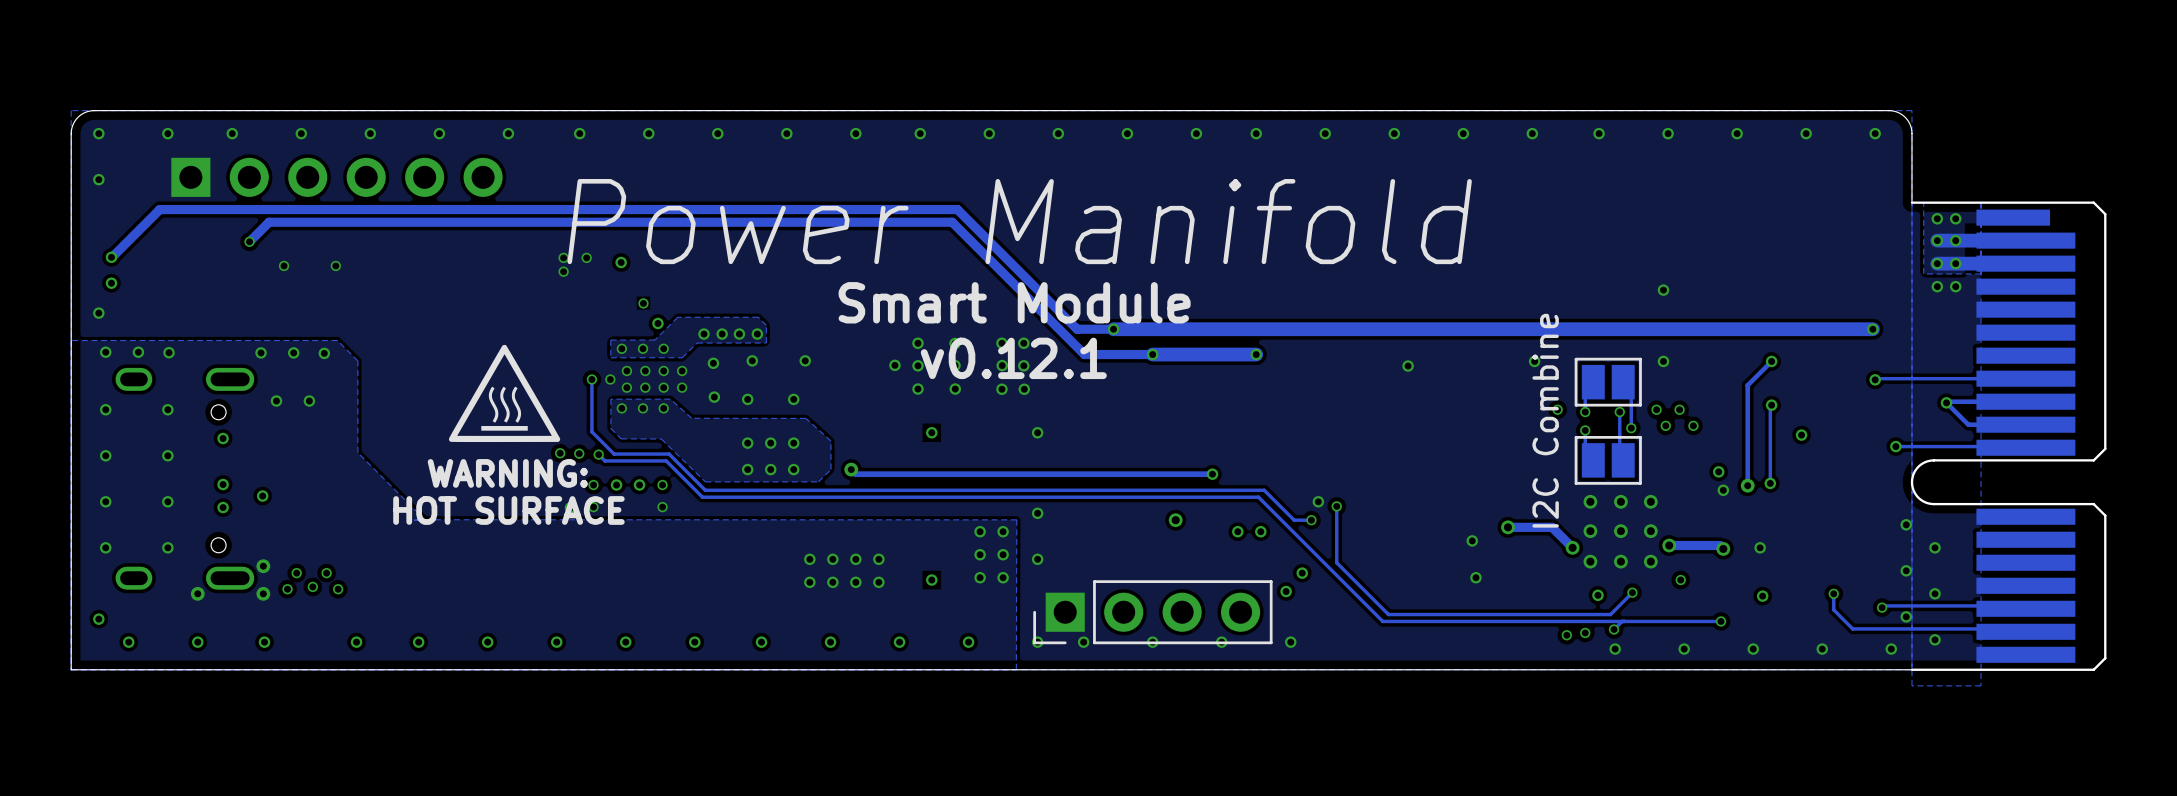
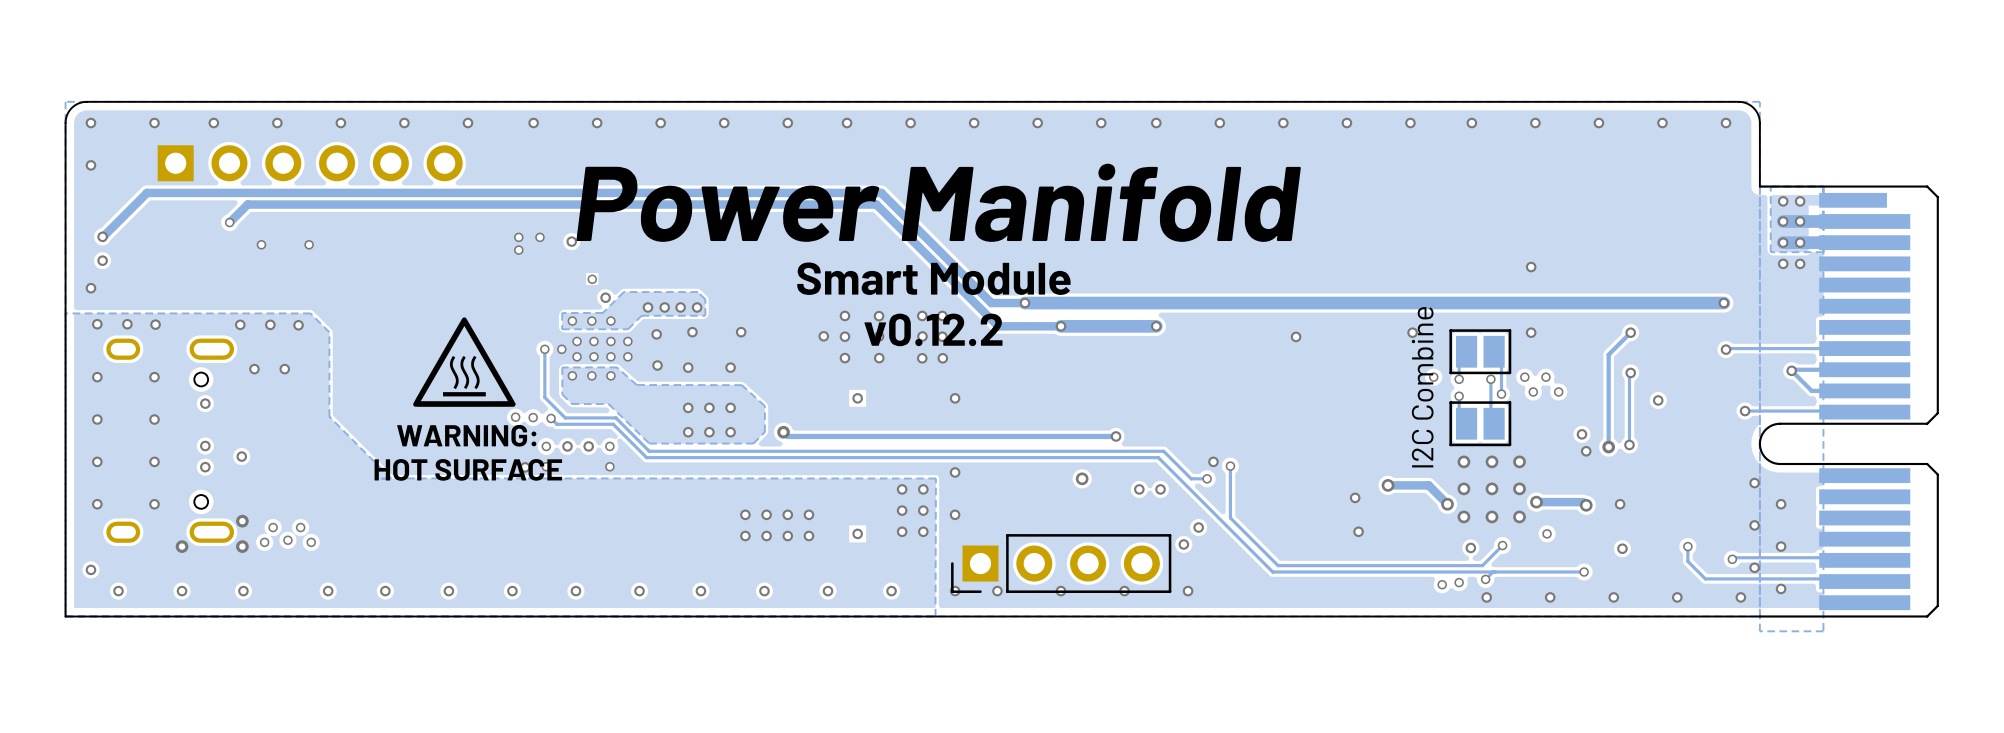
text: v0.12.1 (1013, 358) -> v0.12.2 (933, 329)

